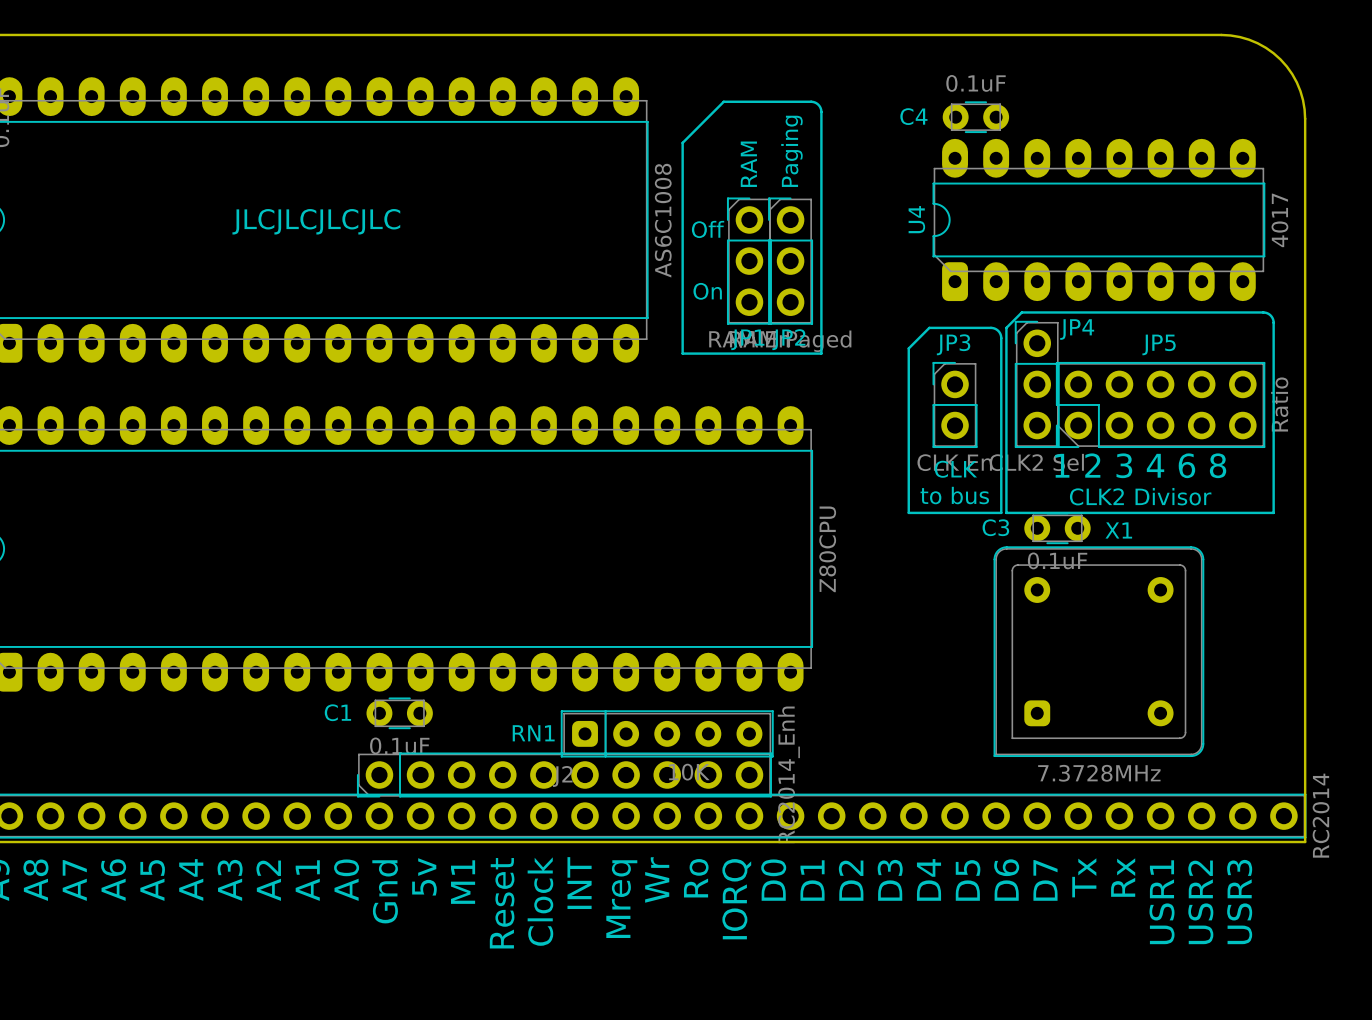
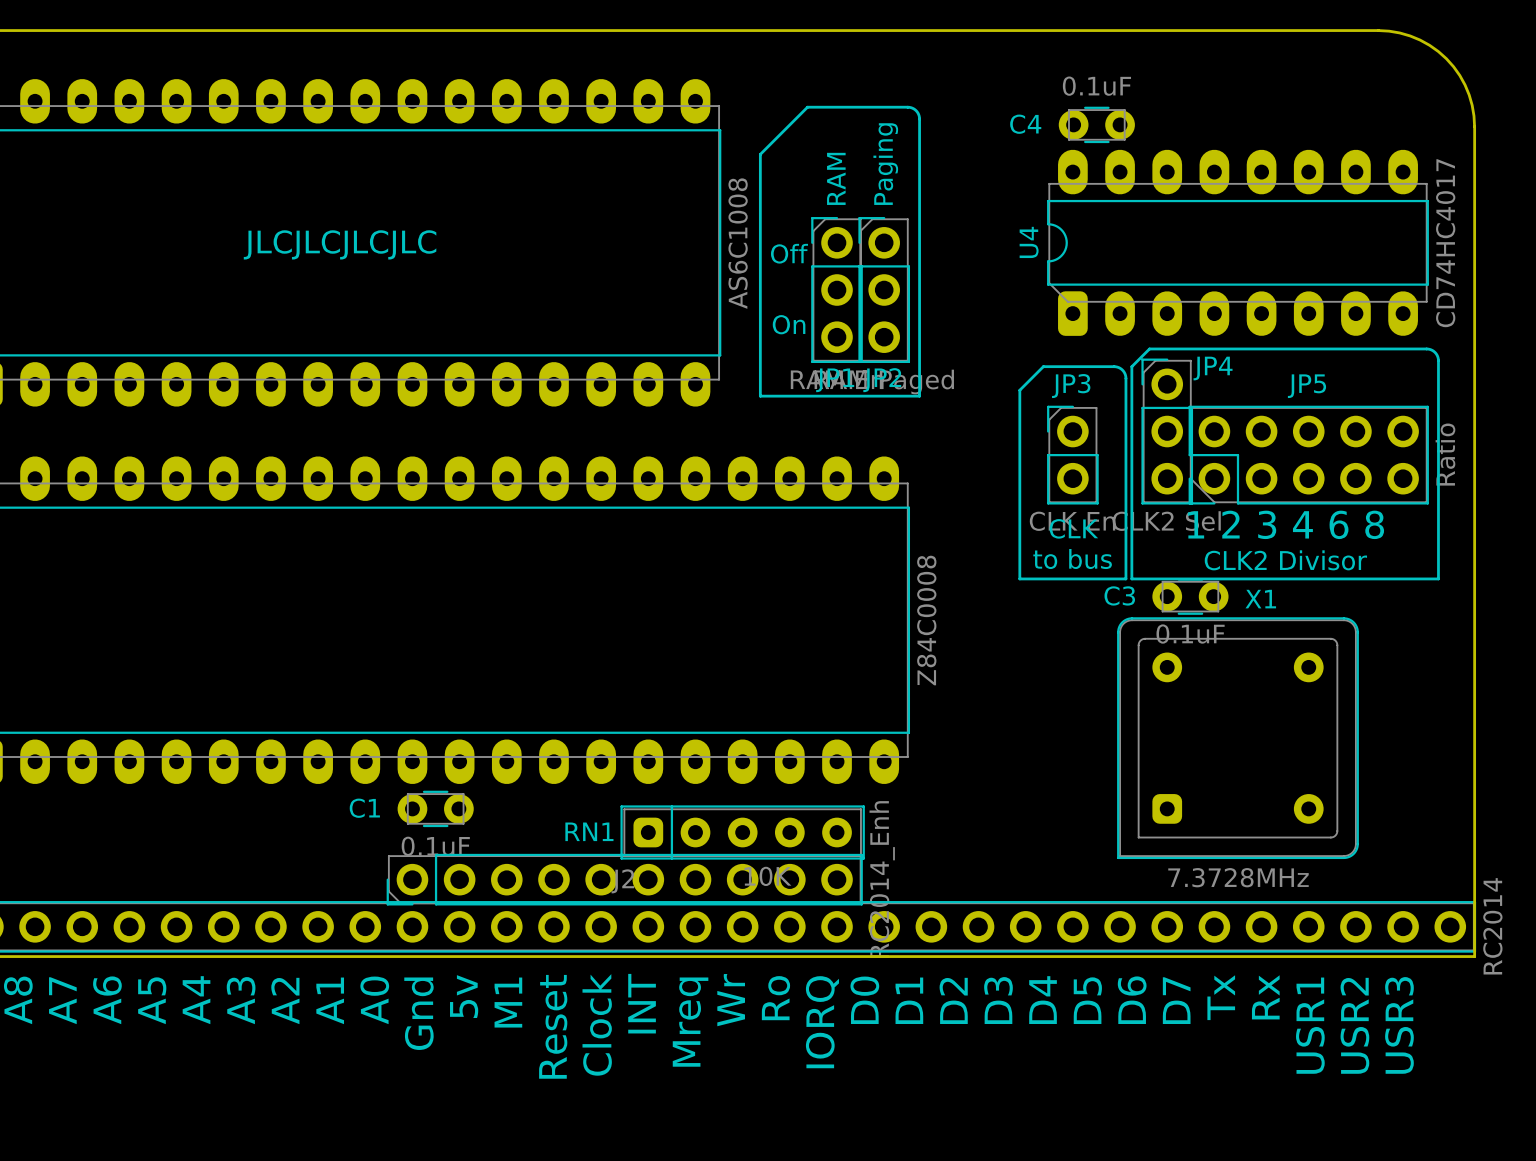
U4 value: 4017 (1279, 220) -> CD74HC4017 (1445, 243)
part value: Z80CPU (827, 549) -> Z84C0008 (926, 620)

